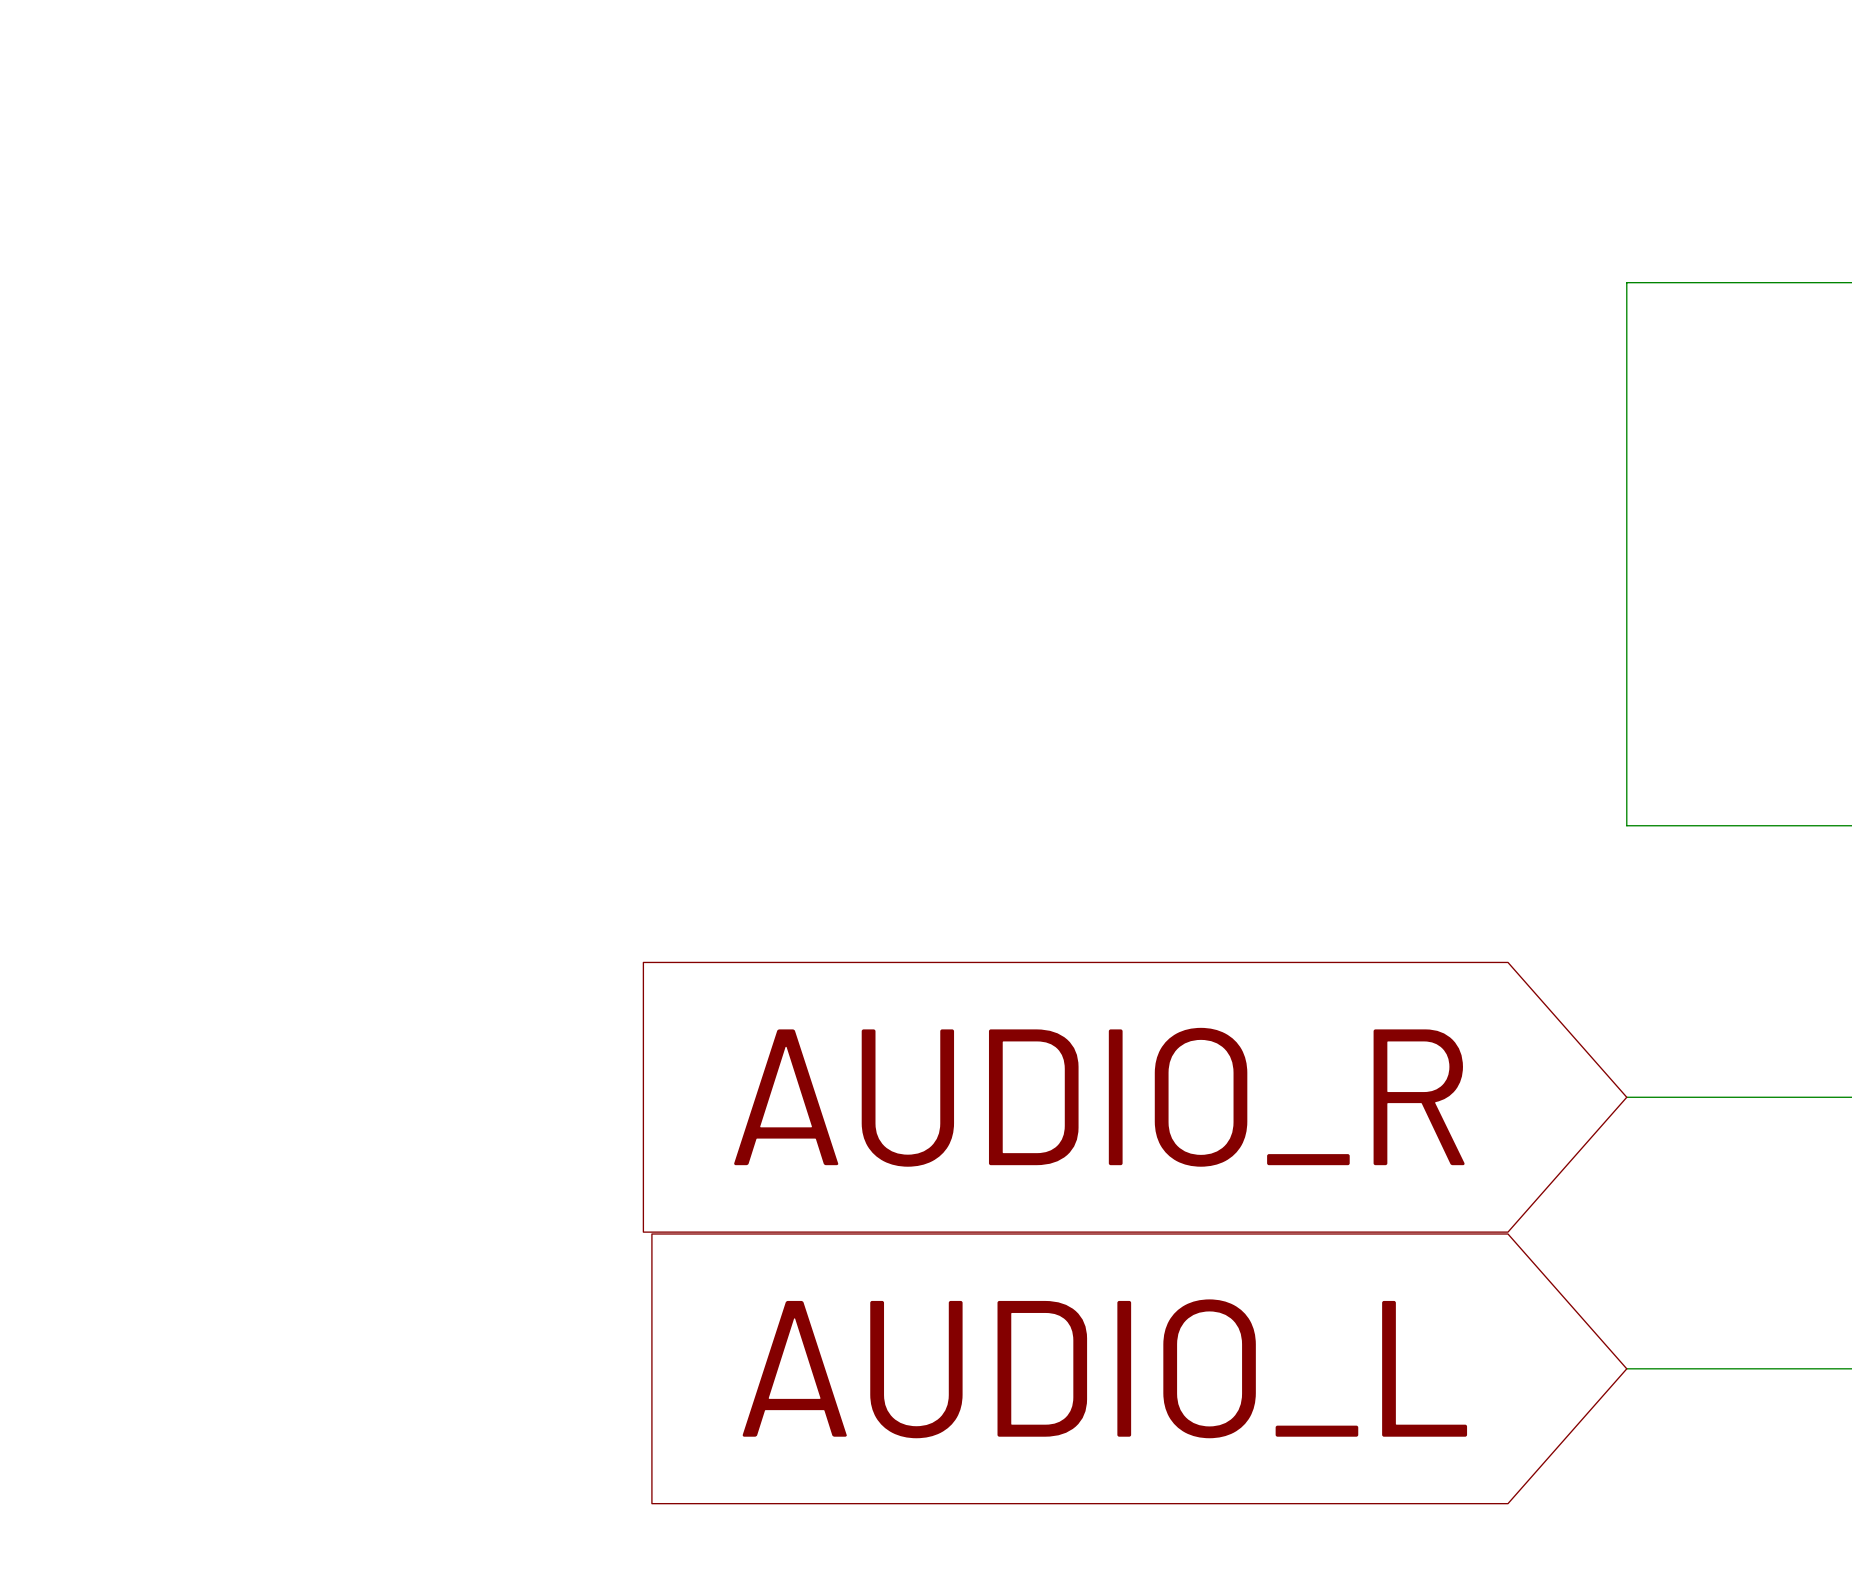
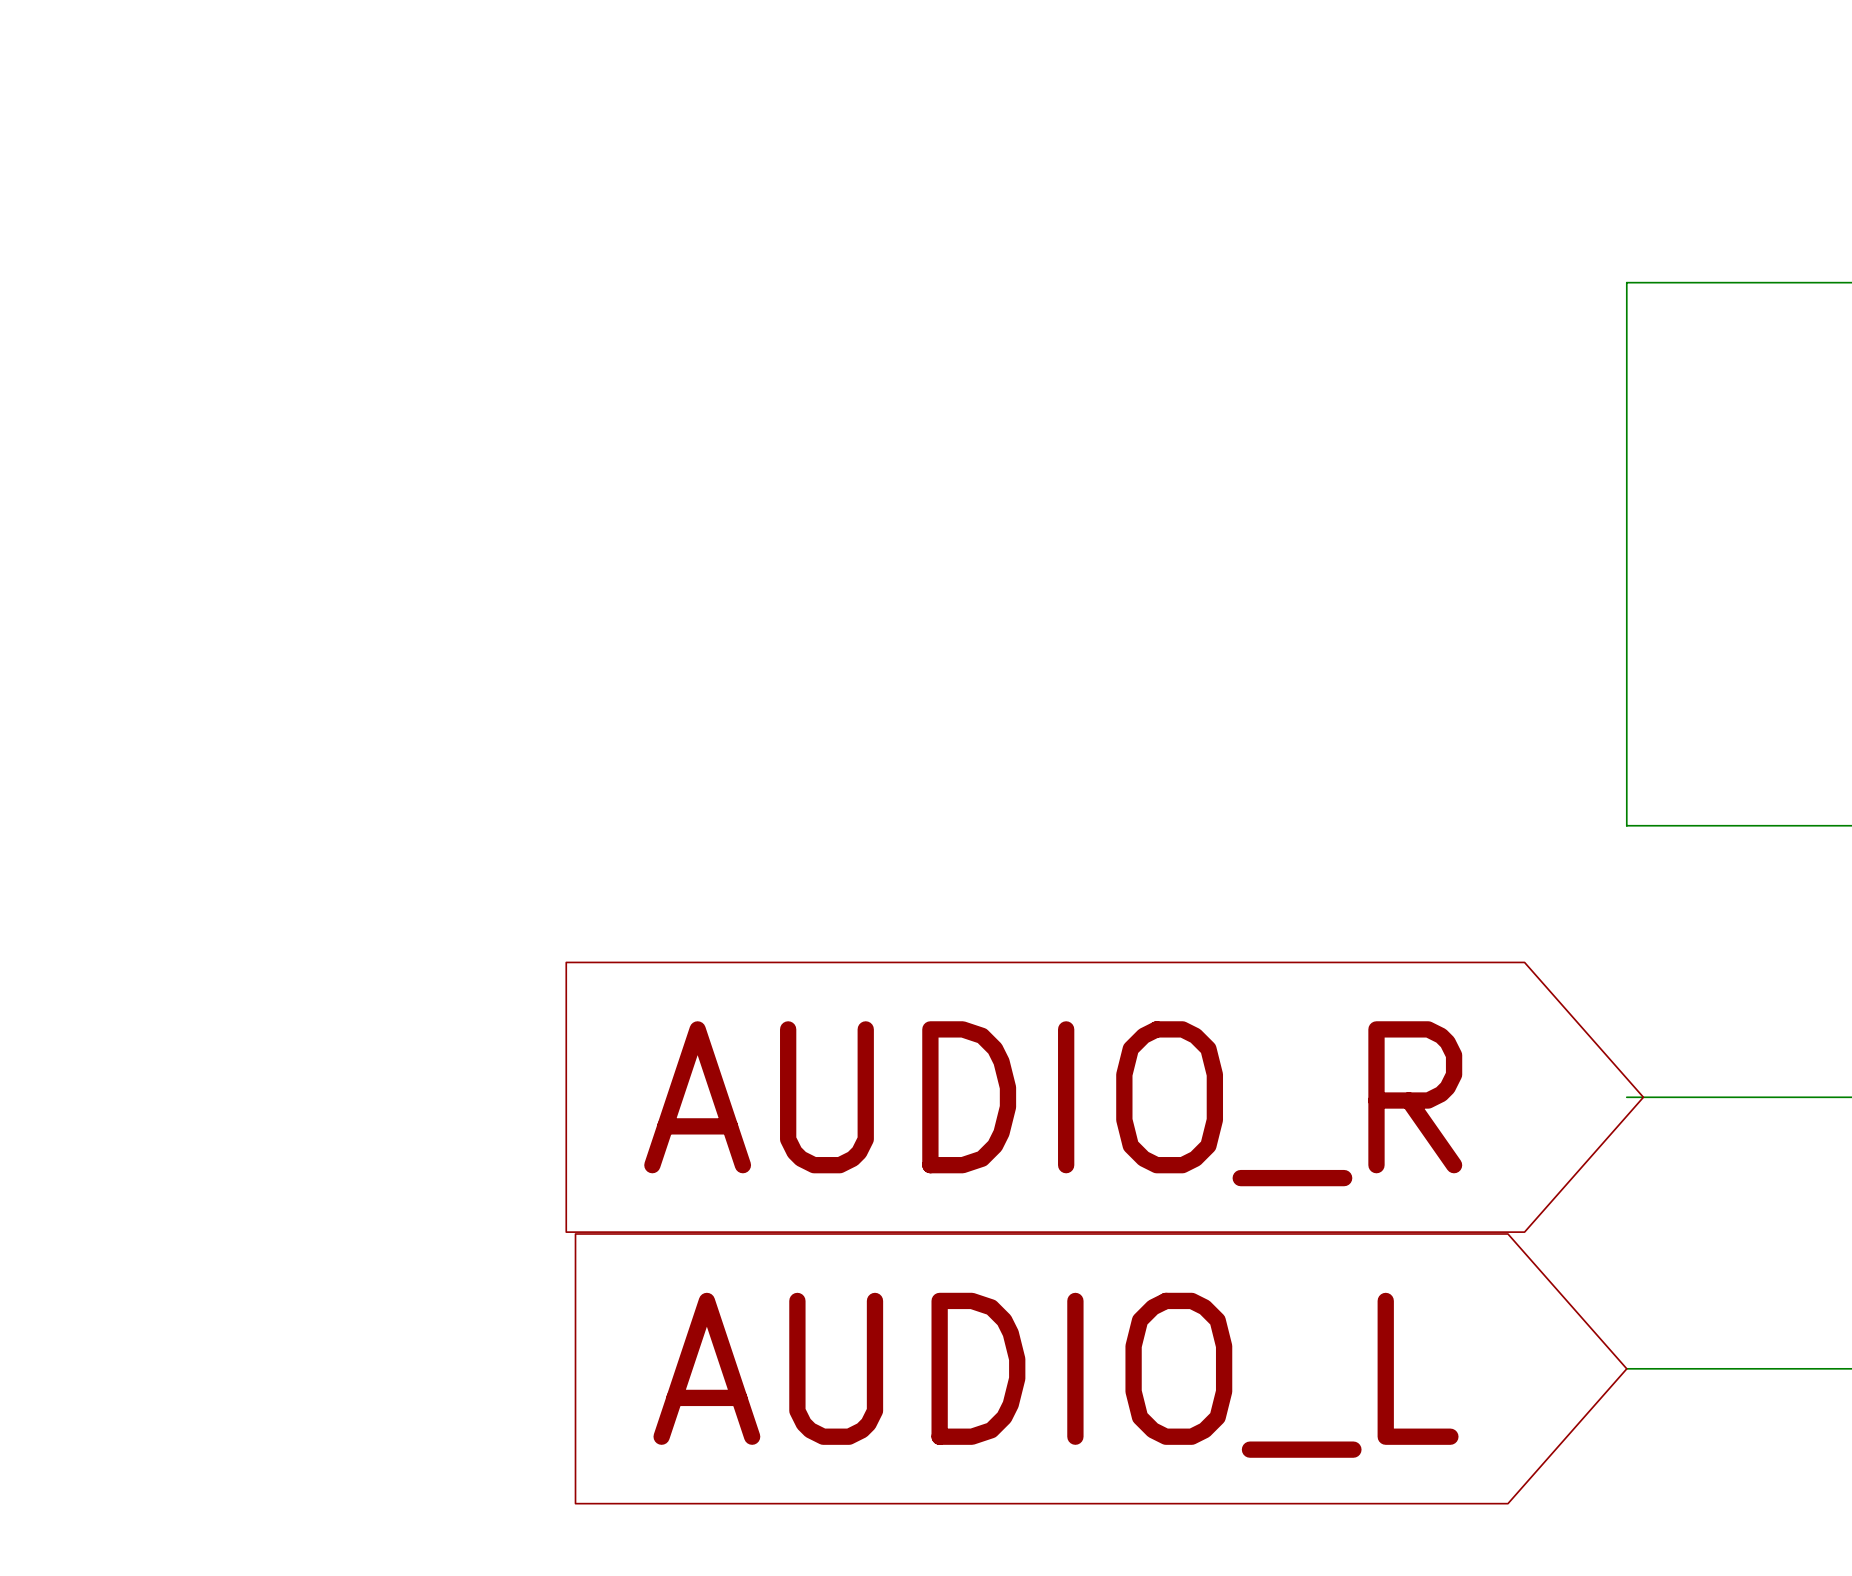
global label position: AUDIO_R (1099, 1097) -> AUDIO_R (1053, 1103)

